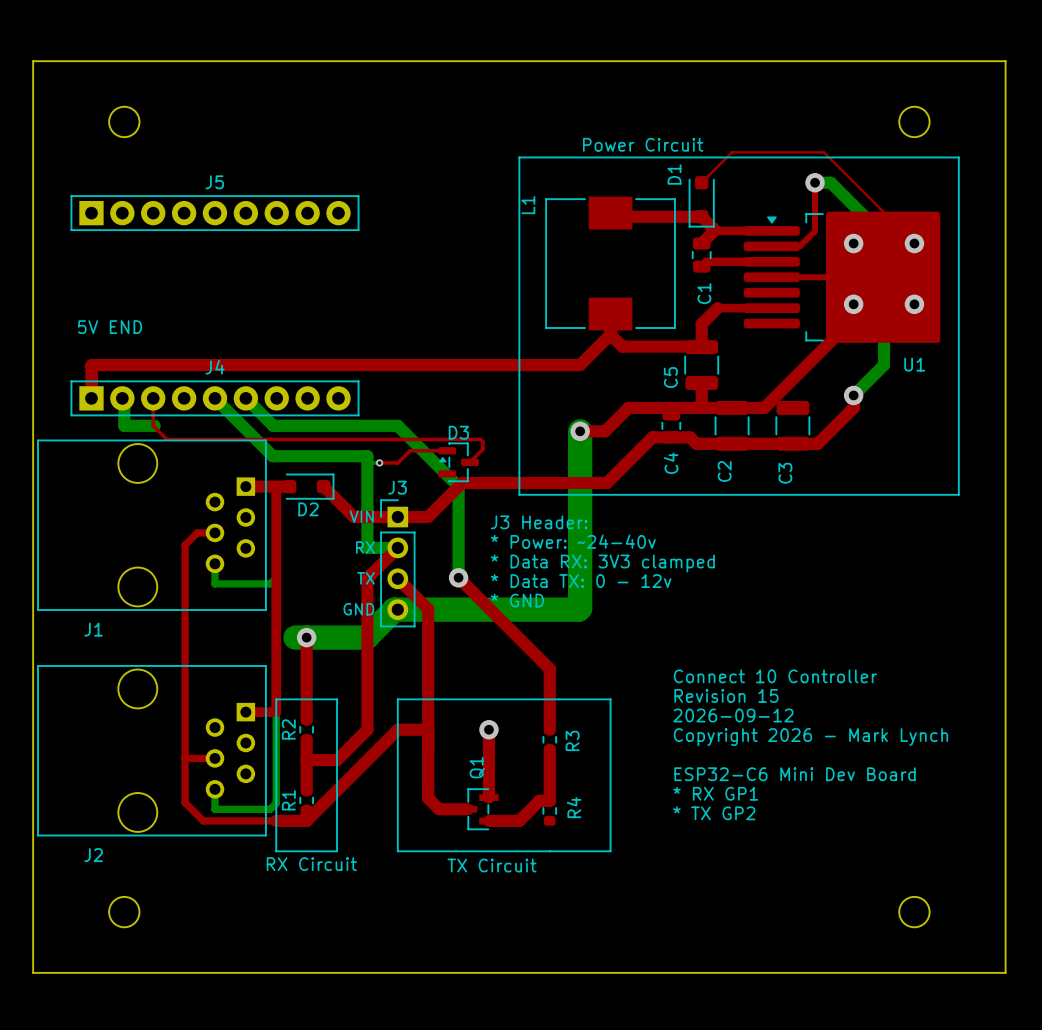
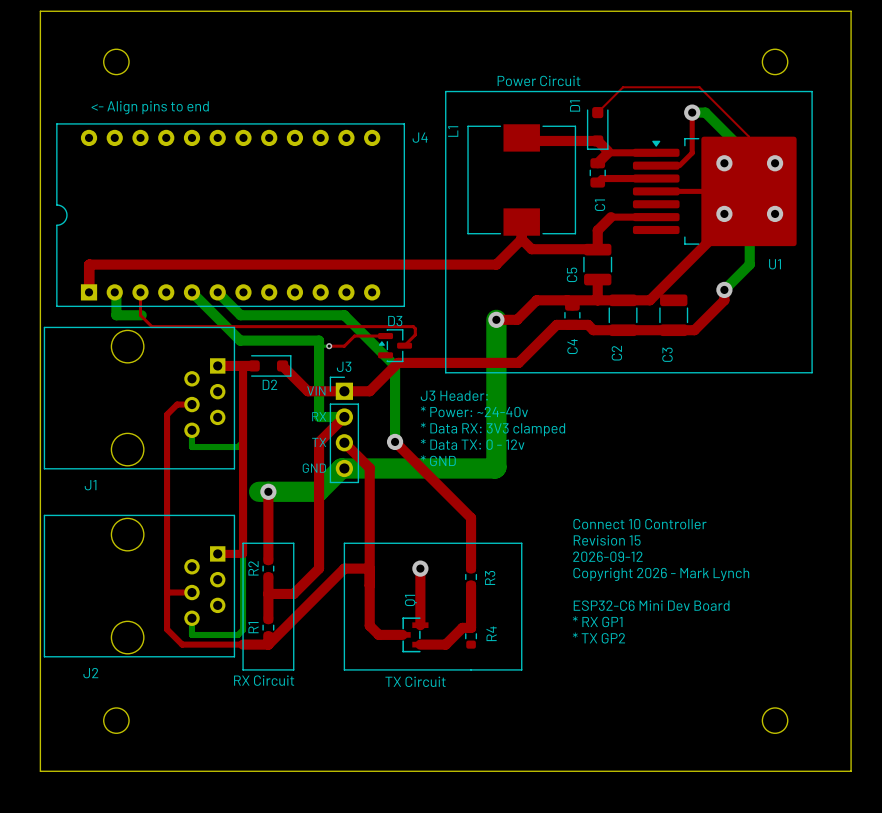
text: none -> <- Align pins to end (150, 107)
J5: (214, 213) -> none
text: 5V END (110, 327) -> none
J4 name position: J4 (214, 367) -> J4 (420, 137)
J4 footprint: [70, 380, 360, 417] -> [56, 123, 405, 307]

